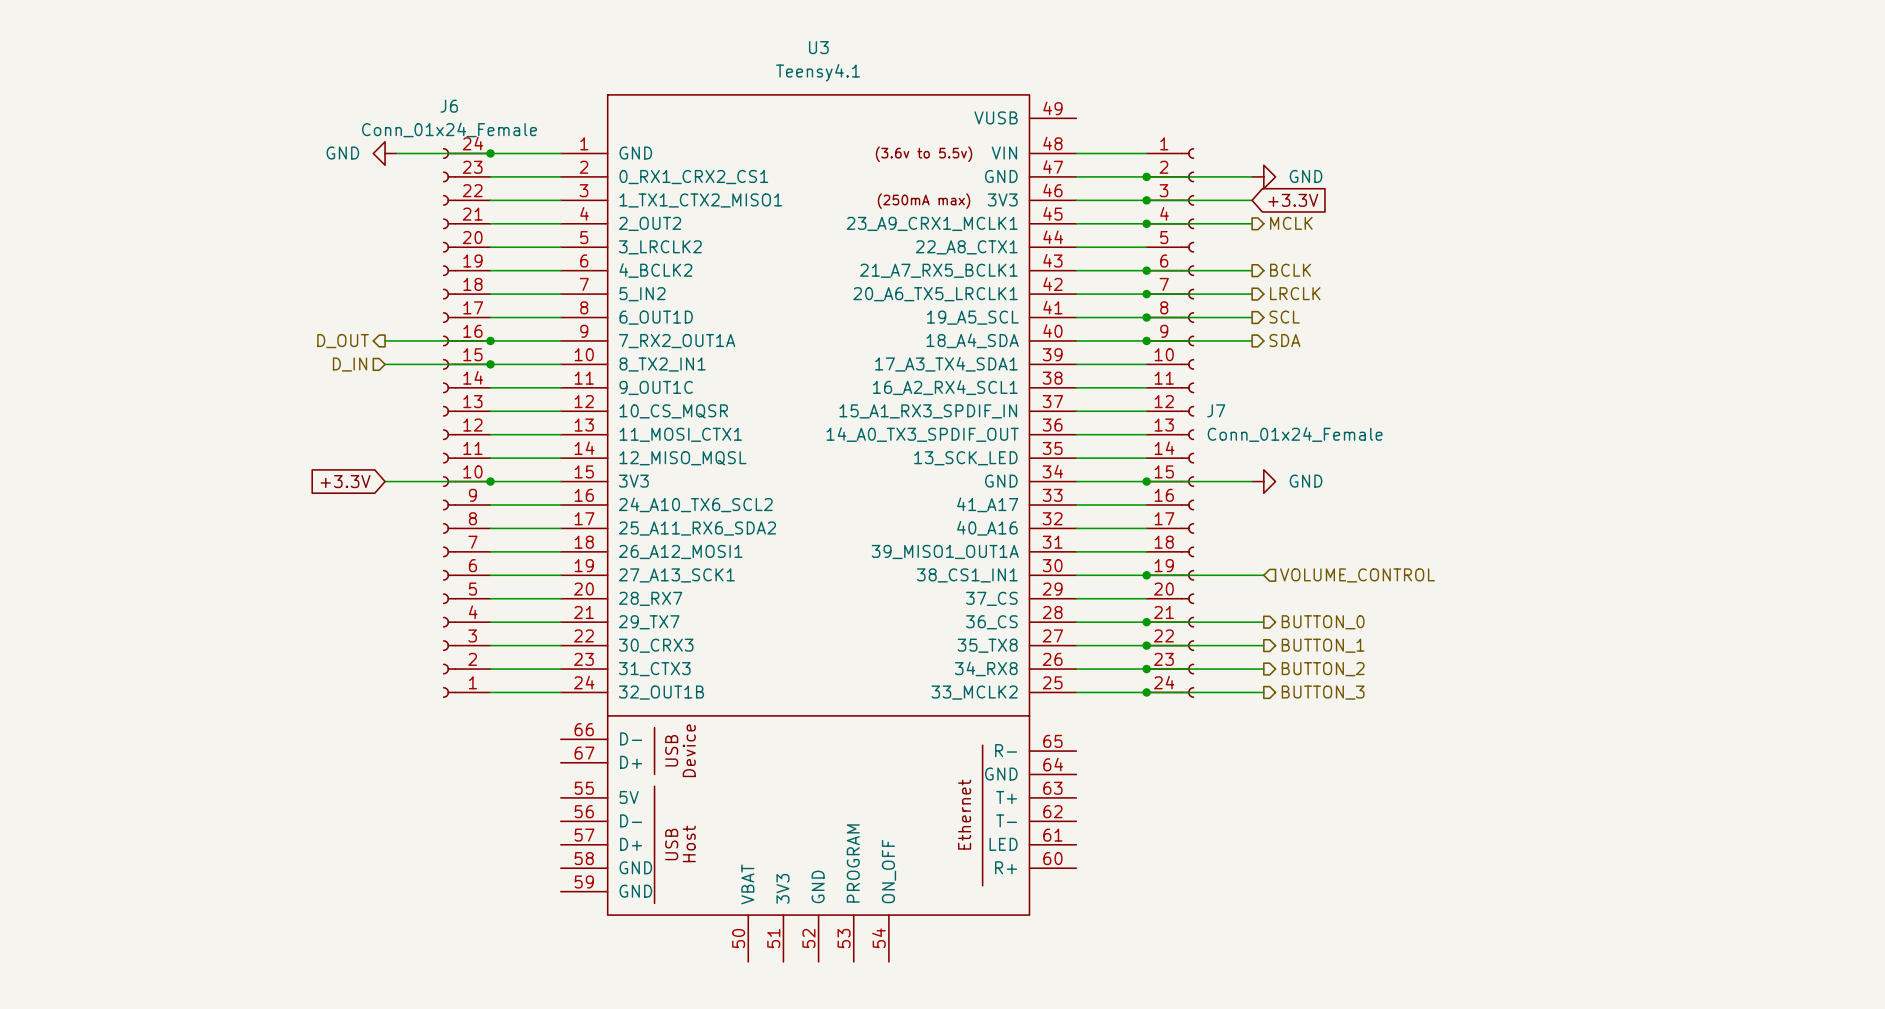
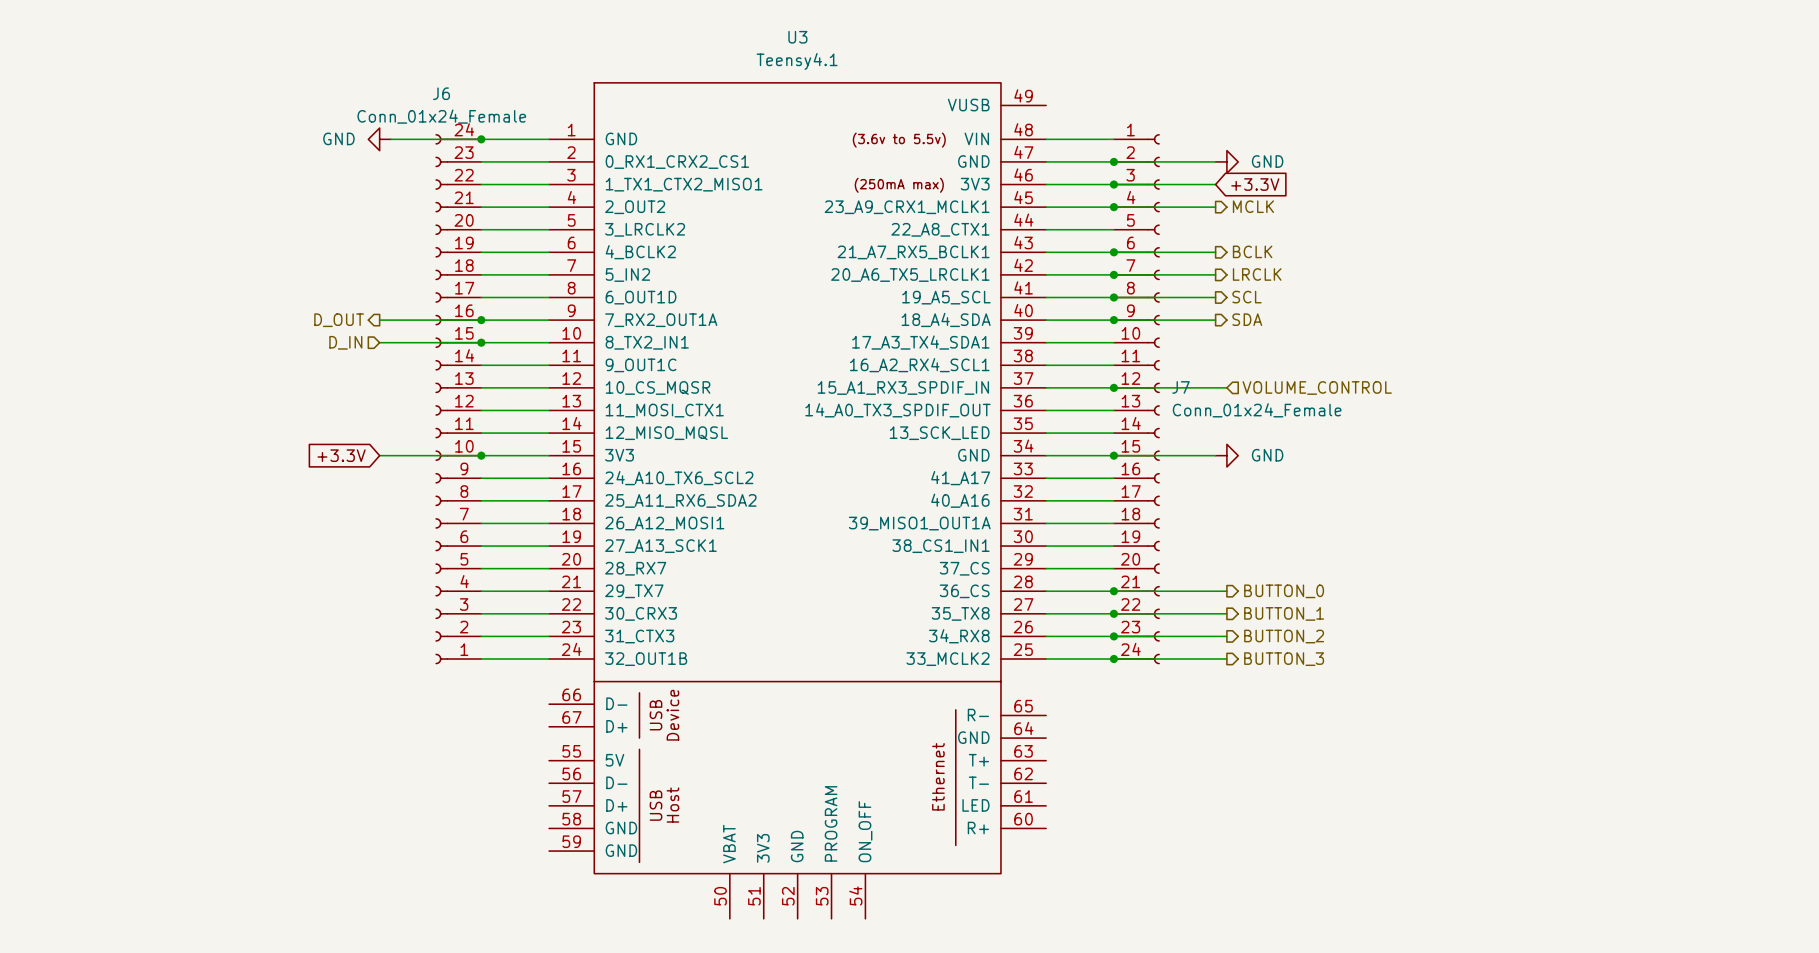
junction: none -> (1113, 387)
wire: (1146, 575) (1263, 575) -> (1113, 387) (1226, 387)
junction: (1146, 575) -> none
hierarchical label position: VOLUME_CONTROL (1357, 575) -> VOLUME_CONTROL (1317, 387)

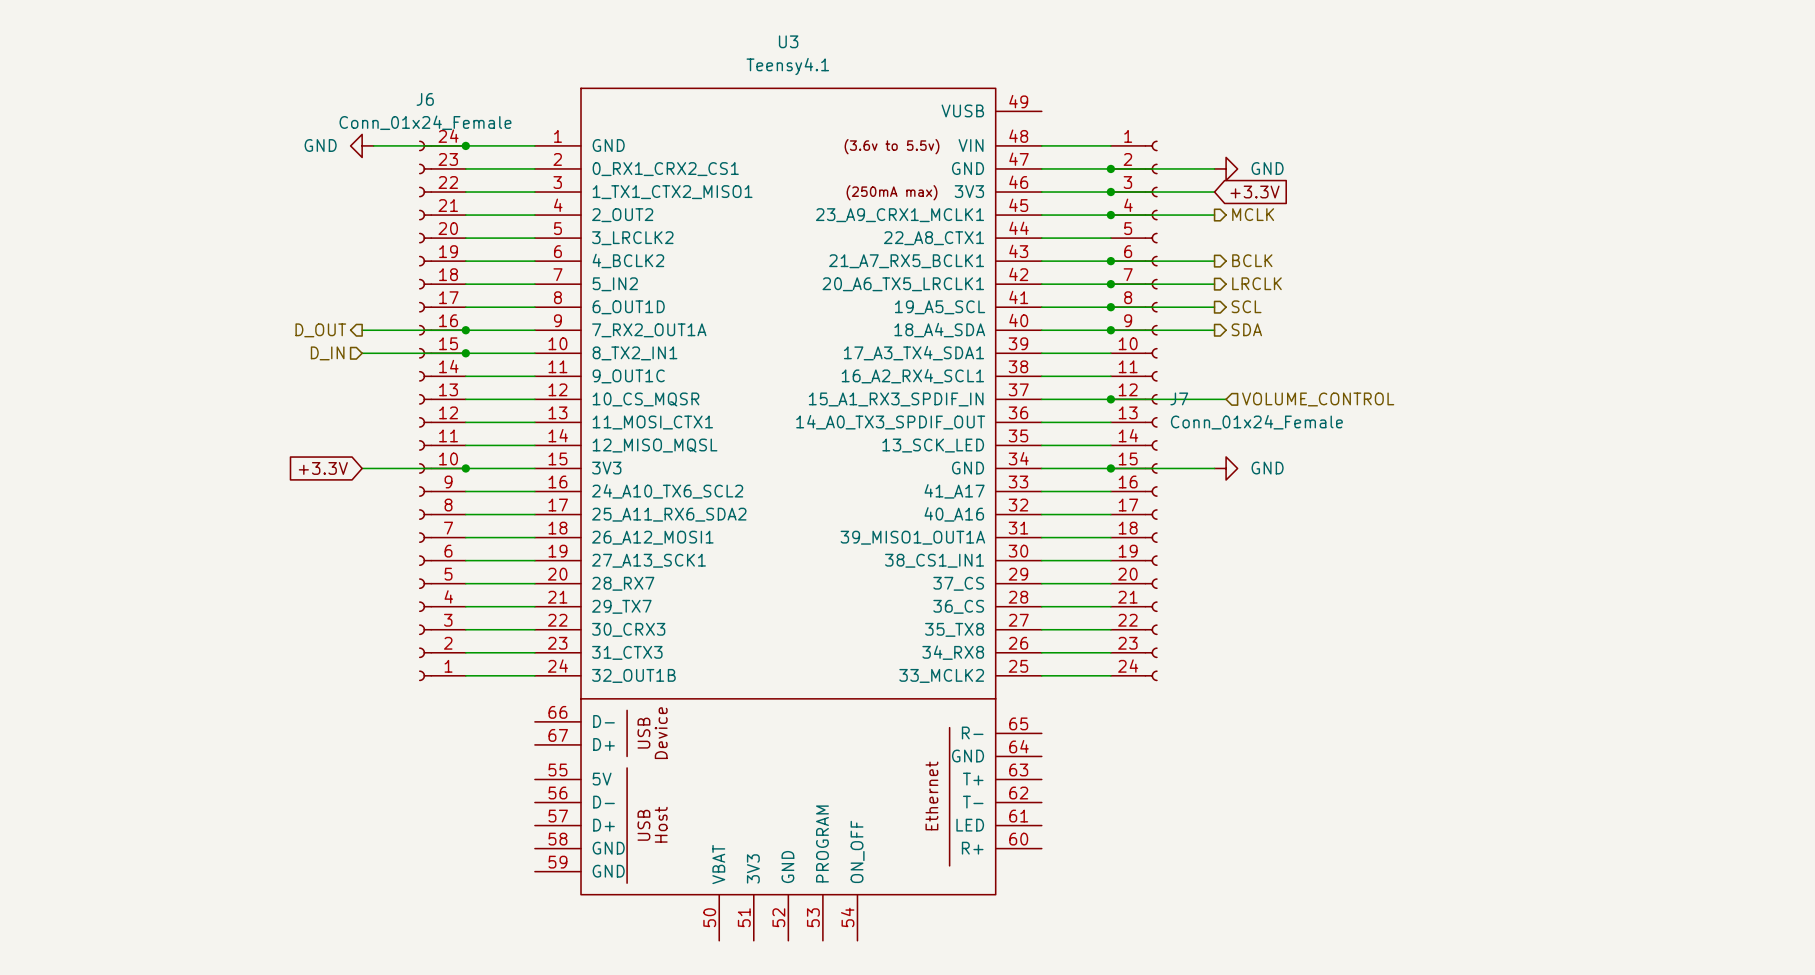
wire: (1113, 591) (1226, 591) -> none
junction: (1113, 591) -> none
hierarchical label: BUTTON_0 (1284, 591) -> none
wire: (1113, 613) (1226, 613) -> none
junction: (1113, 613) -> none
hierarchical label: BUTTON_1 (1284, 613) -> none
wire: (1113, 636) (1226, 636) -> none
junction: (1113, 636) -> none
hierarchical label: BUTTON_2 (1284, 636) -> none
wire: (1113, 659) (1226, 659) -> none
junction: (1113, 659) -> none
hierarchical label: BUTTON_3 (1284, 659) -> none

